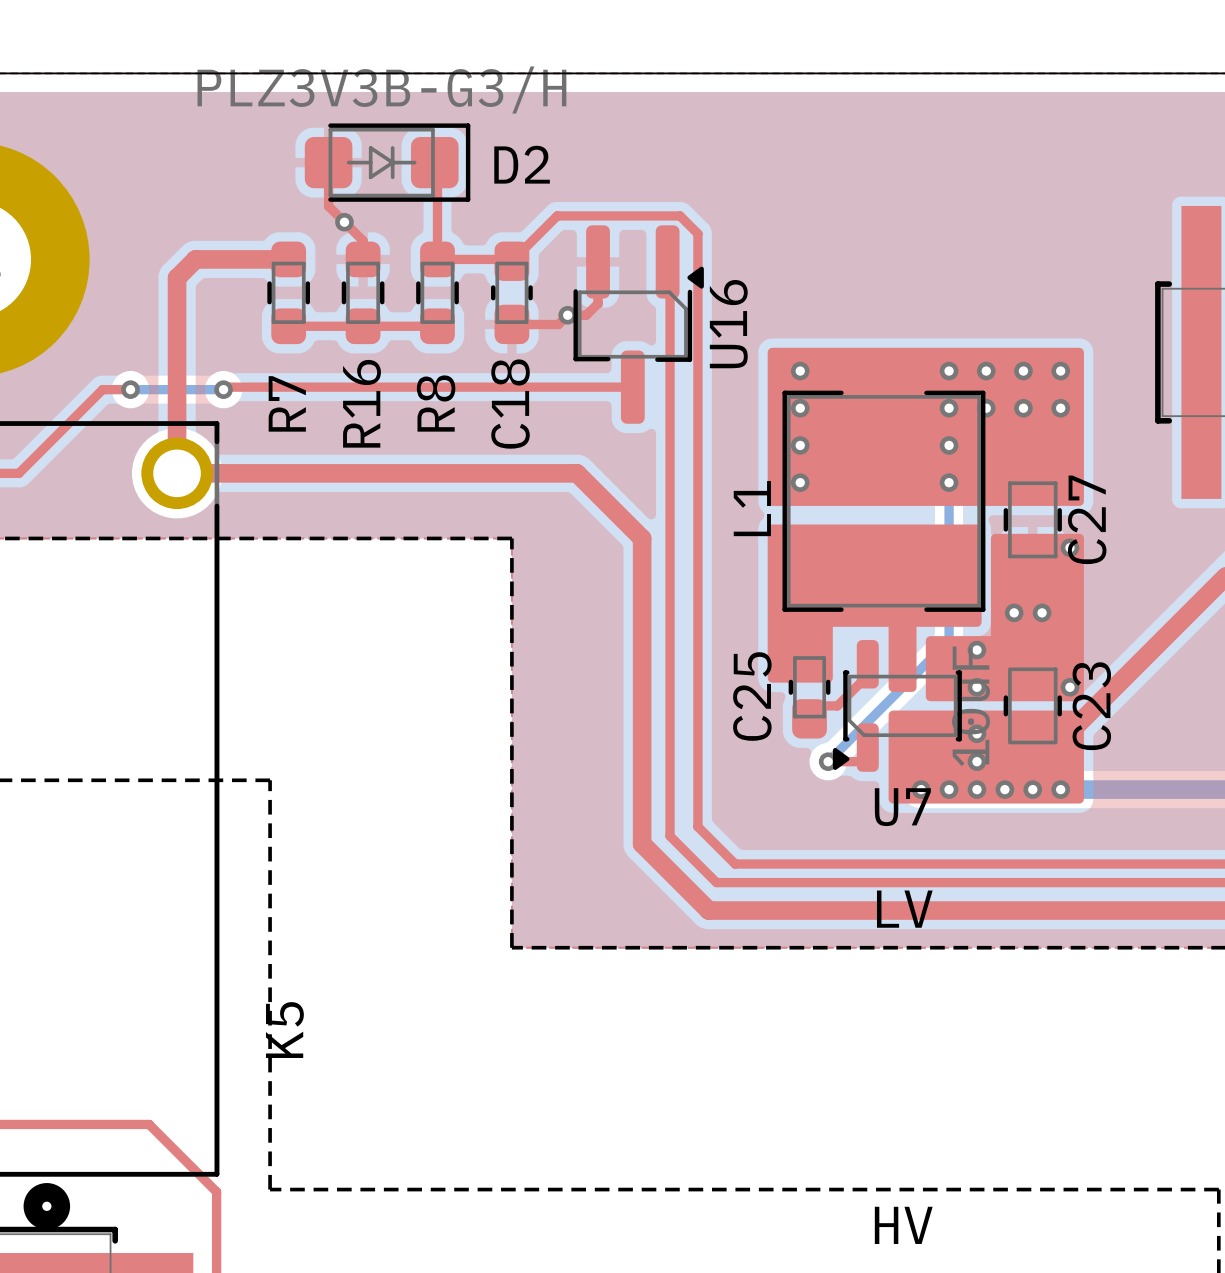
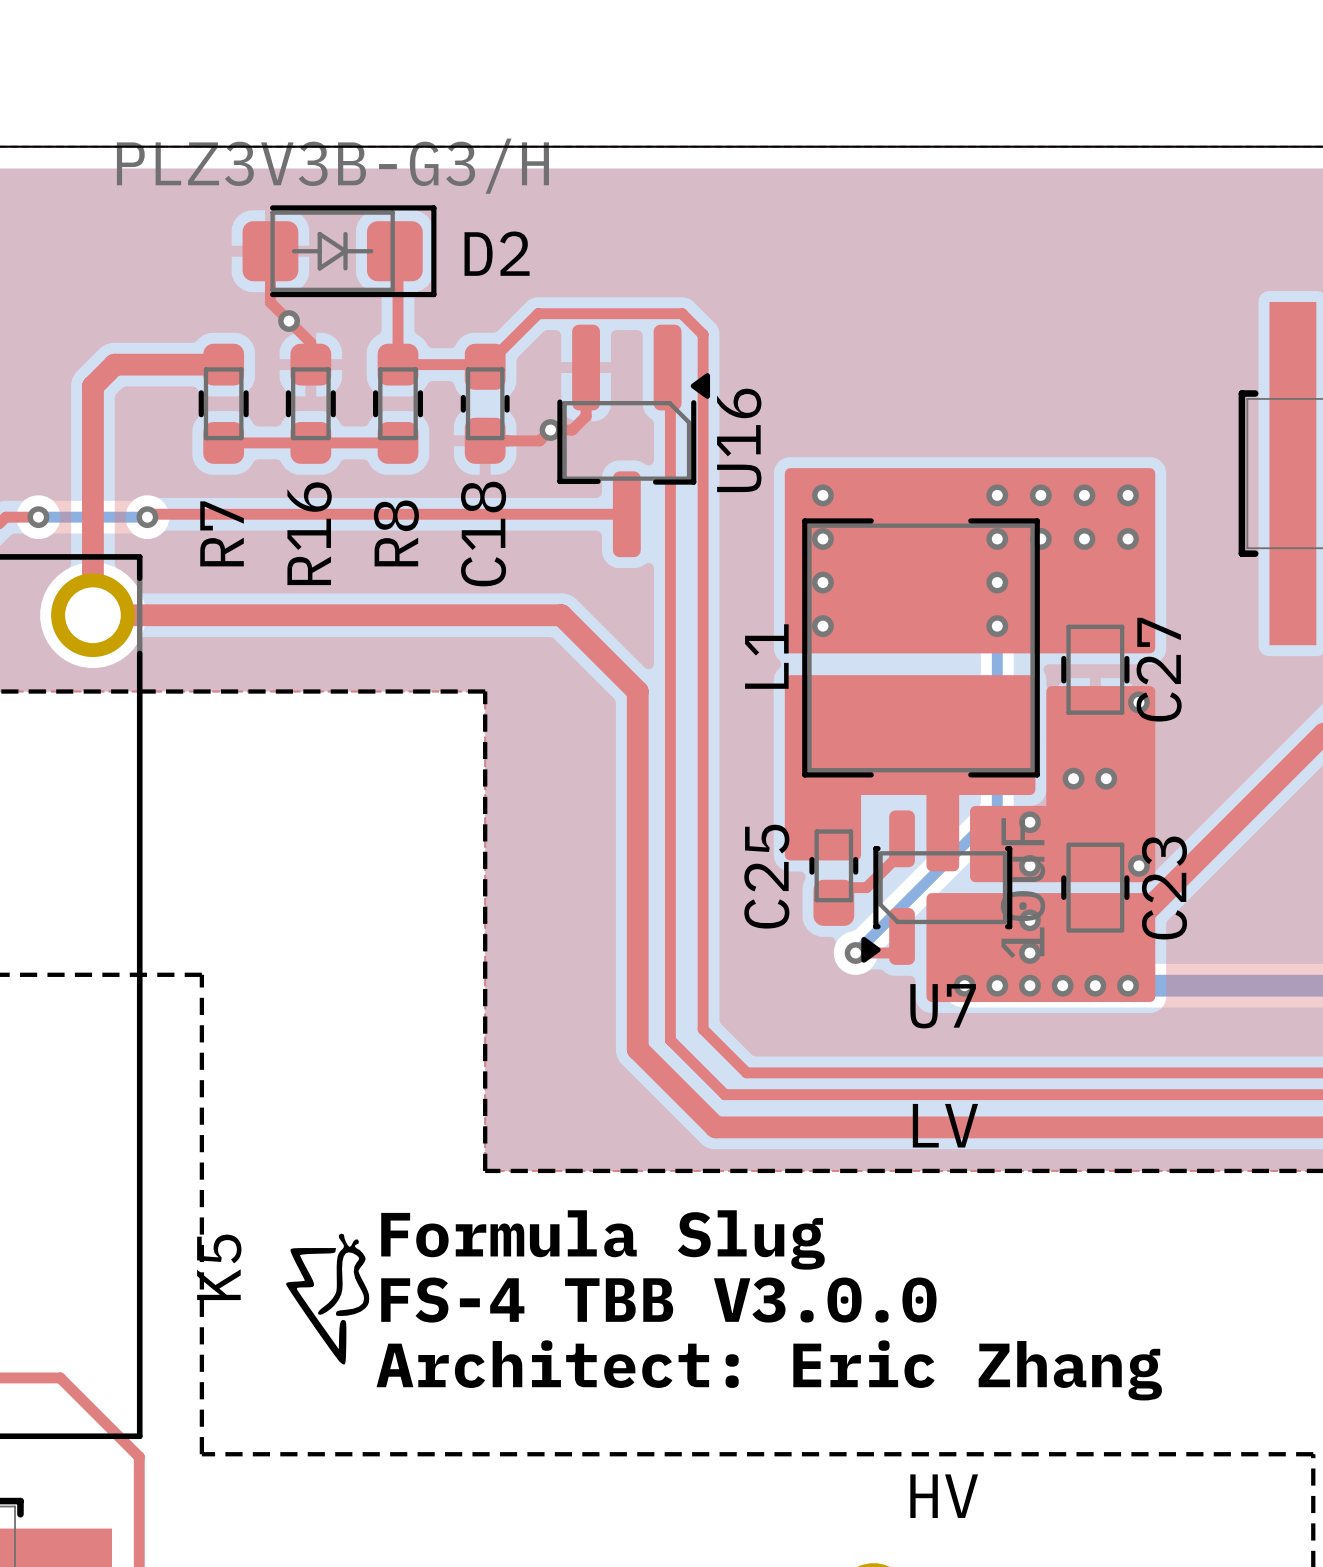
drawing: none -> [285, 1233, 370, 1365]

